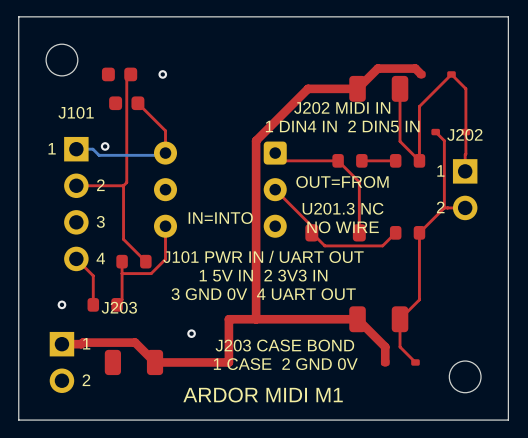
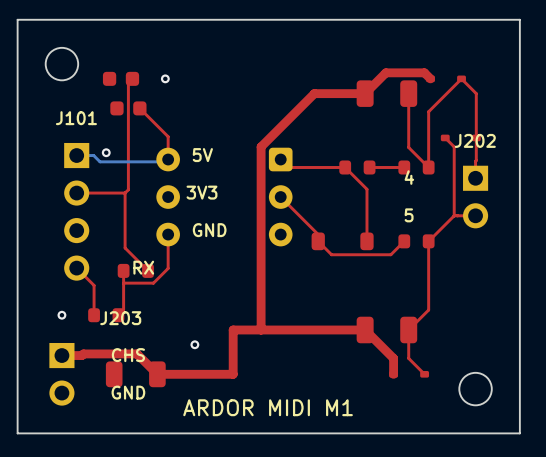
text: J202 MIDI IN (342, 107) -> none
text: 1 DIN4 IN 2 DIN5 IN (342, 126) -> none
text: 1 (52, 148) -> none
text: none -> 5V (202, 155)
text: 1 (440, 170) -> none
text: OUT=FROM (342, 182) -> none
text: 2 (100, 185) -> none
text: none -> 3V3 (201, 192)
text: none -> 5 (409, 215)
text: 2 (440, 207) -> none
text: U201.3 NC (343, 208) -> none
text: IN=INTO (220, 218) -> none
text: 3 (100, 221) -> none
text: none -> GND (209, 230)
text: NO WIRE (343, 227) -> none
text: J101 PWR IN / UART OUT (263, 256) -> none
text position: 4 (100, 258) -> 4 (409, 177)
text: none -> RX (143, 267)
text: 1 5V IN 2 3V3 IN (263, 275) -> none
text: 3 GND 0V 4 UART OUT (263, 294) -> none
text: 1 (86, 343) -> none
text: none -> CHS (128, 355)
text: J203 CASE BOND (284, 345) -> none
text: 1 CASE 2 GND 0V (285, 364) -> none
text: 2 (86, 380) -> none
text: none -> GND (128, 392)

